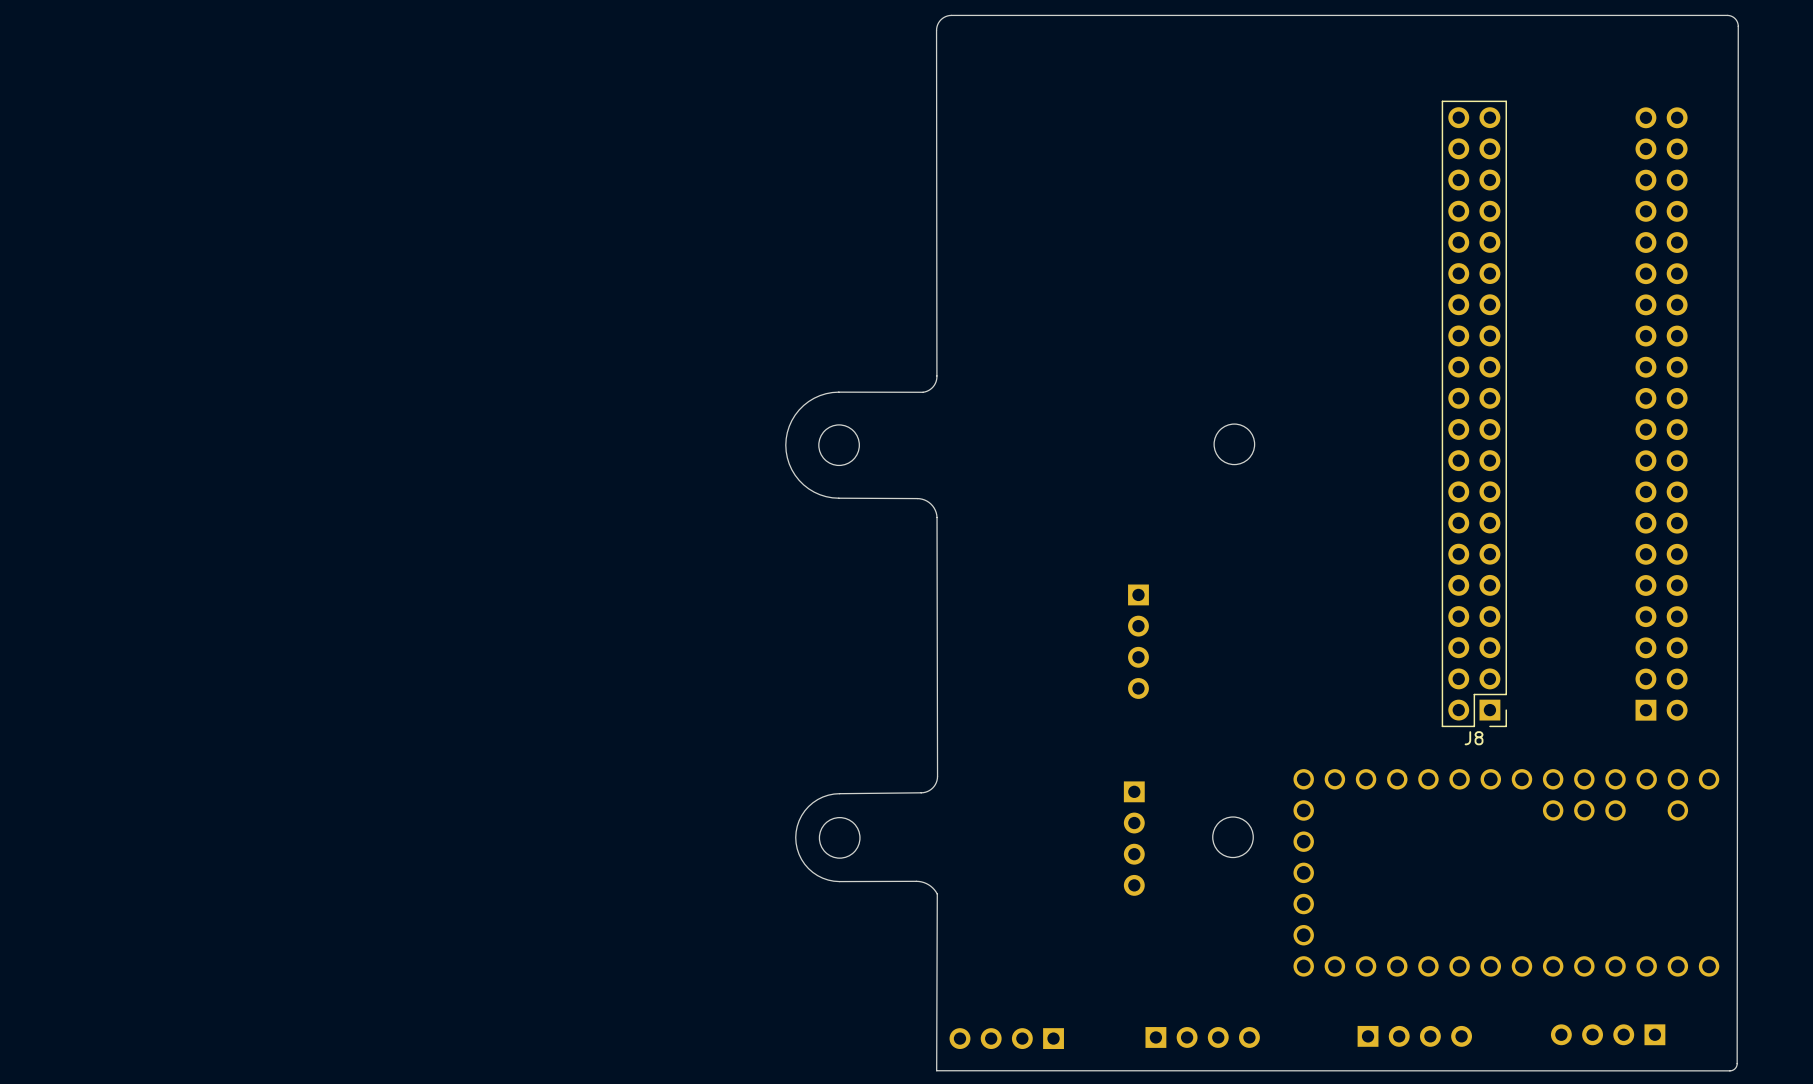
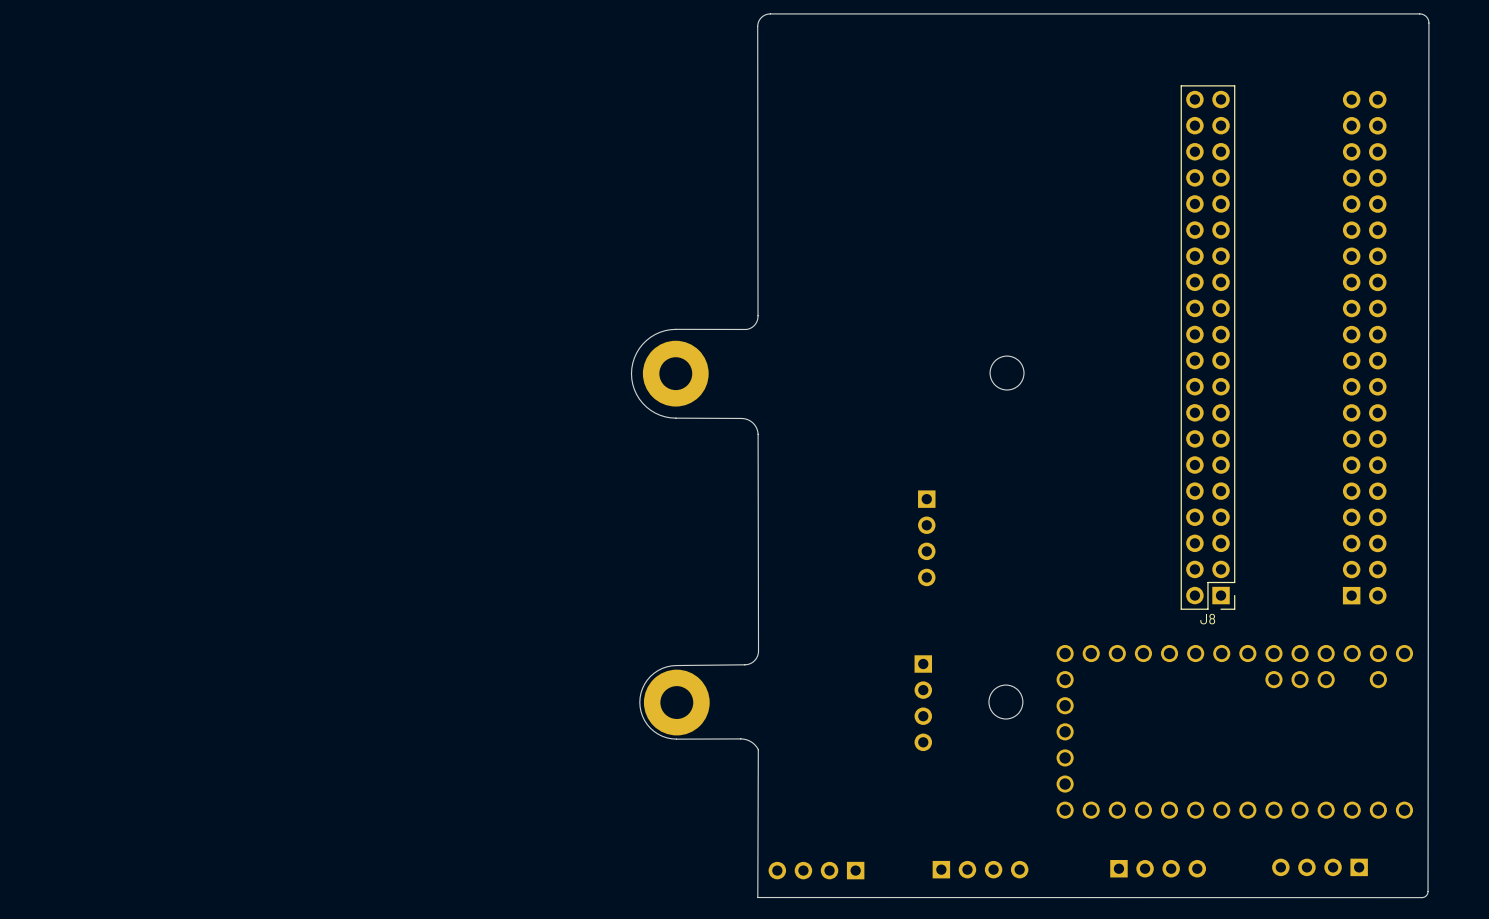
round board edge: [818, 424, 860, 466] -> none
part: none -> (675, 373)
round board edge: [819, 817, 861, 859] -> none
part: none -> (676, 702)

